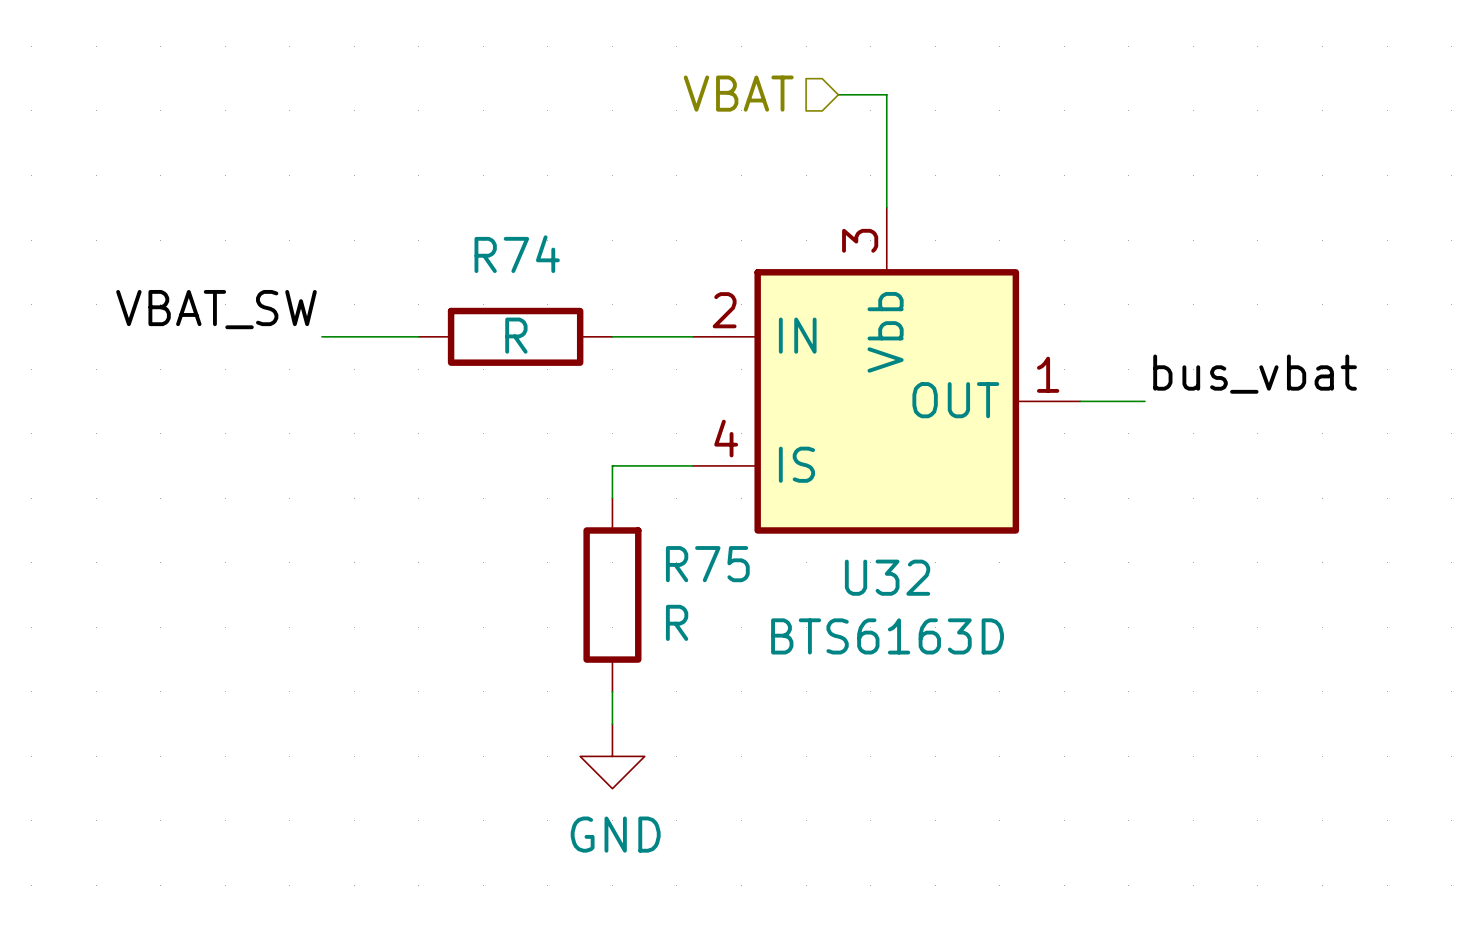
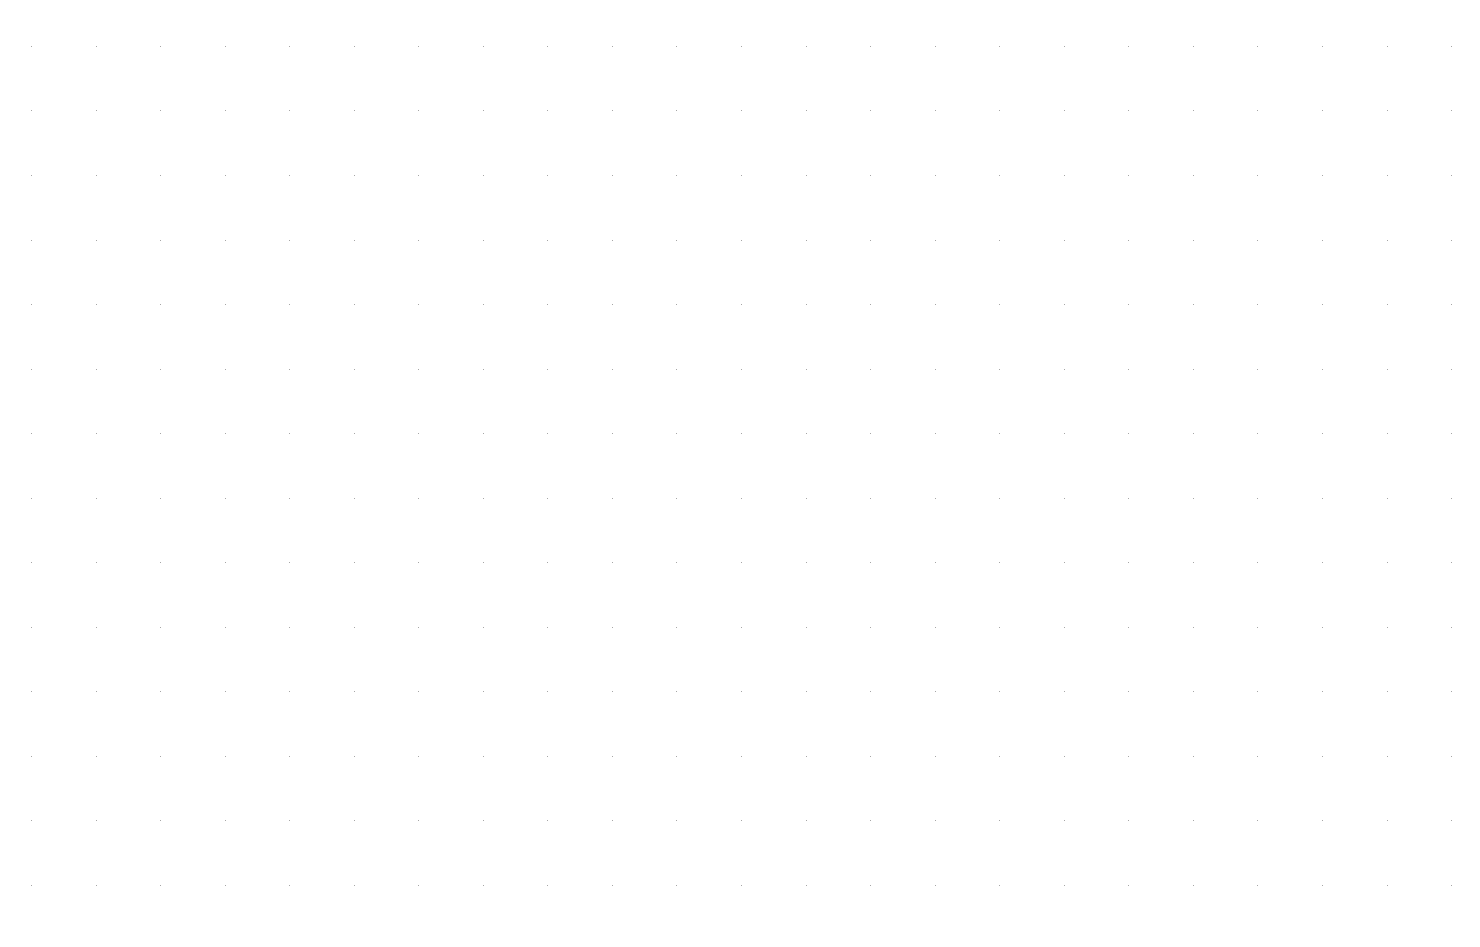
hierarchical label: VBAT (738, 93) -> none
wire: (838, 94) (886, 94) (886, 207) -> none
label: VBAT_SW (216, 309) -> none
wire: (321, 336) (418, 336) -> none
R74: R (515, 336) -> none
wire: (612, 336) (693, 336) -> none
U32: BTS6163D (886, 370) -> none
label: bus_vbat (1255, 374) -> none
wire: (1080, 401) (1144, 401) -> none
wire: (693, 465) (612, 465) (612, 498) -> none
R75: R (612, 595) -> none
wire: (612, 691) (612, 724) -> none
power symbol: GND (612, 756) -> none

